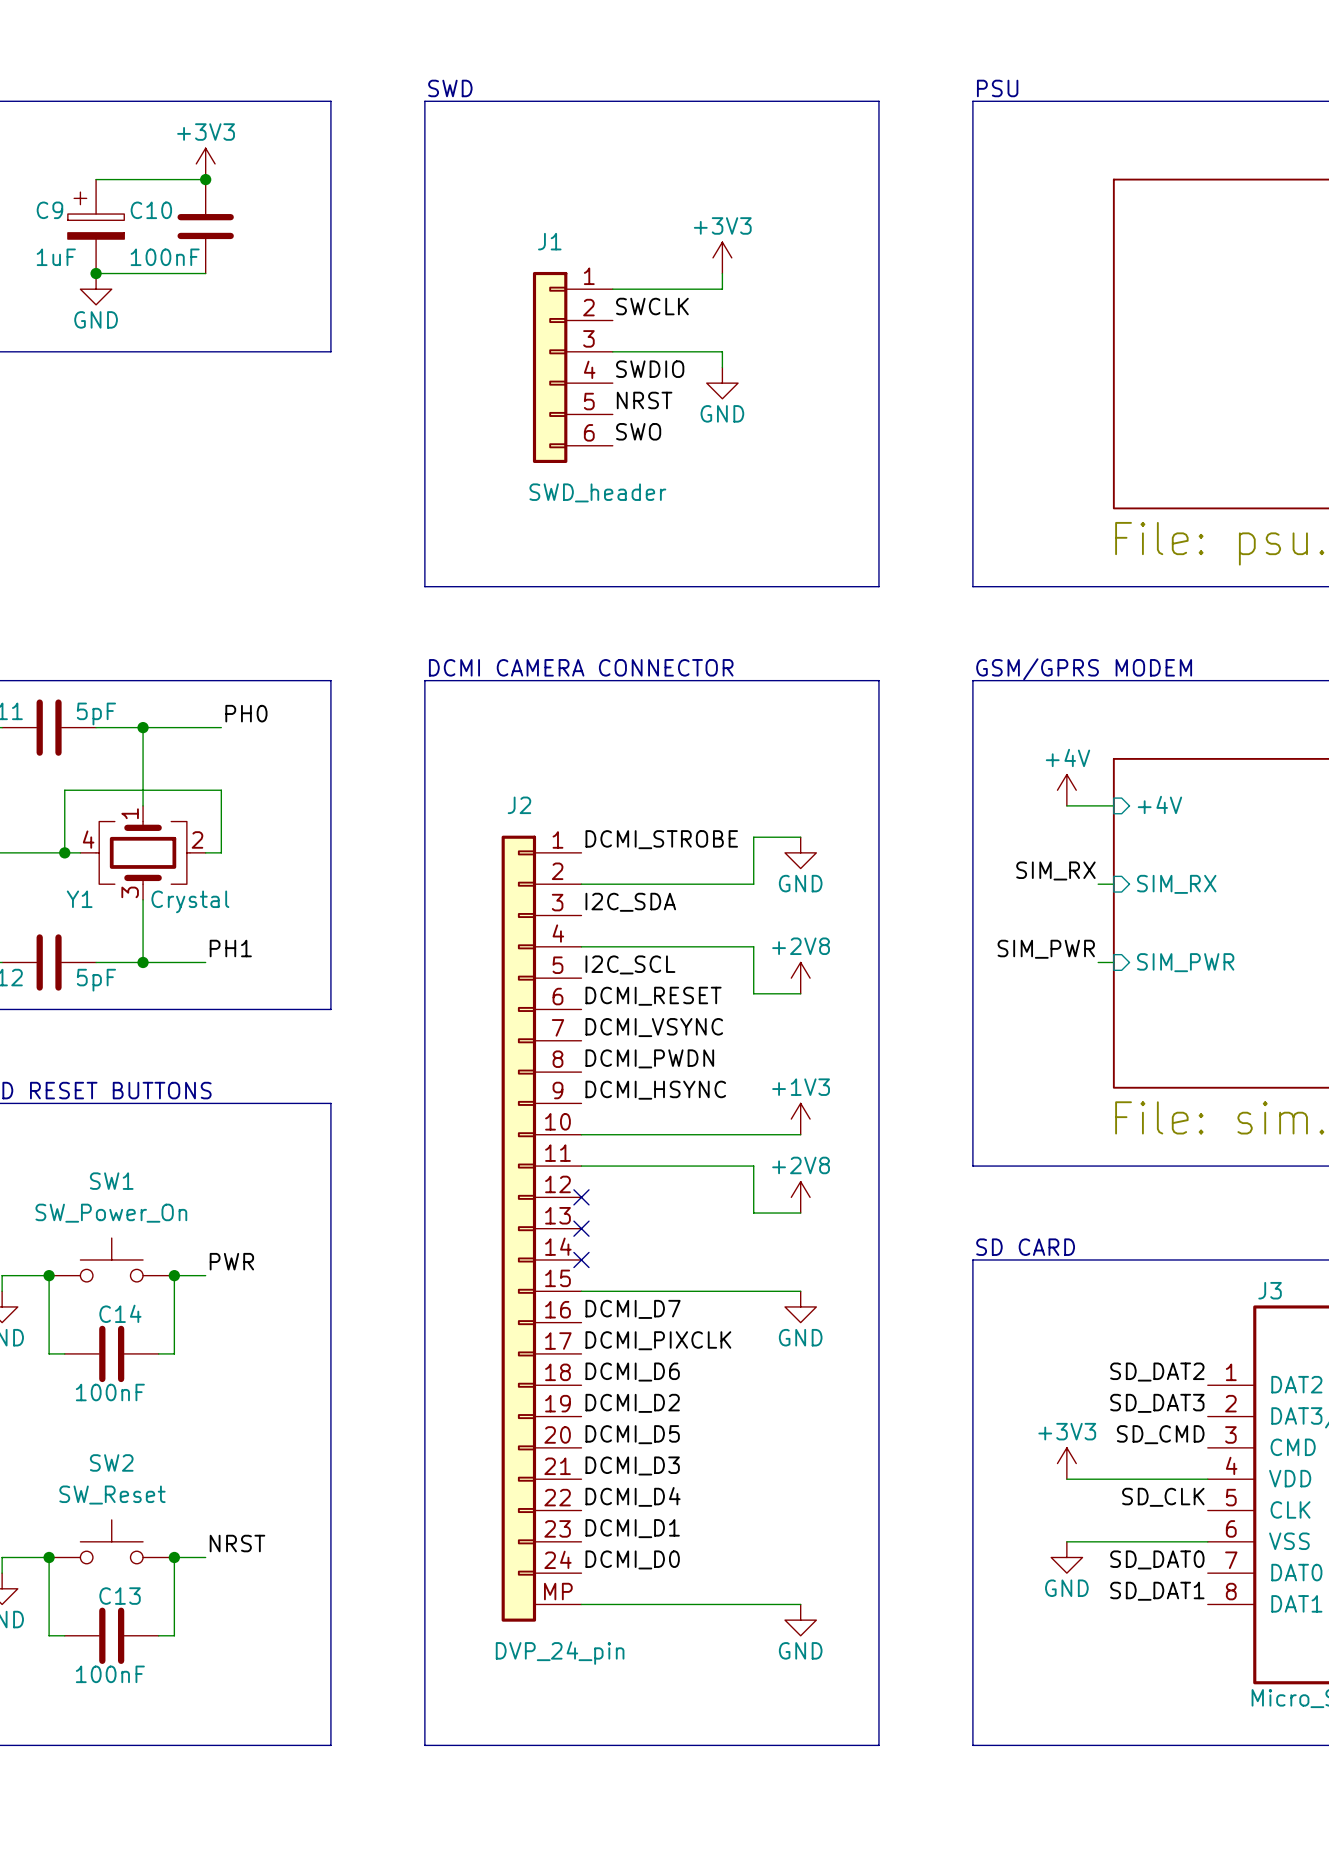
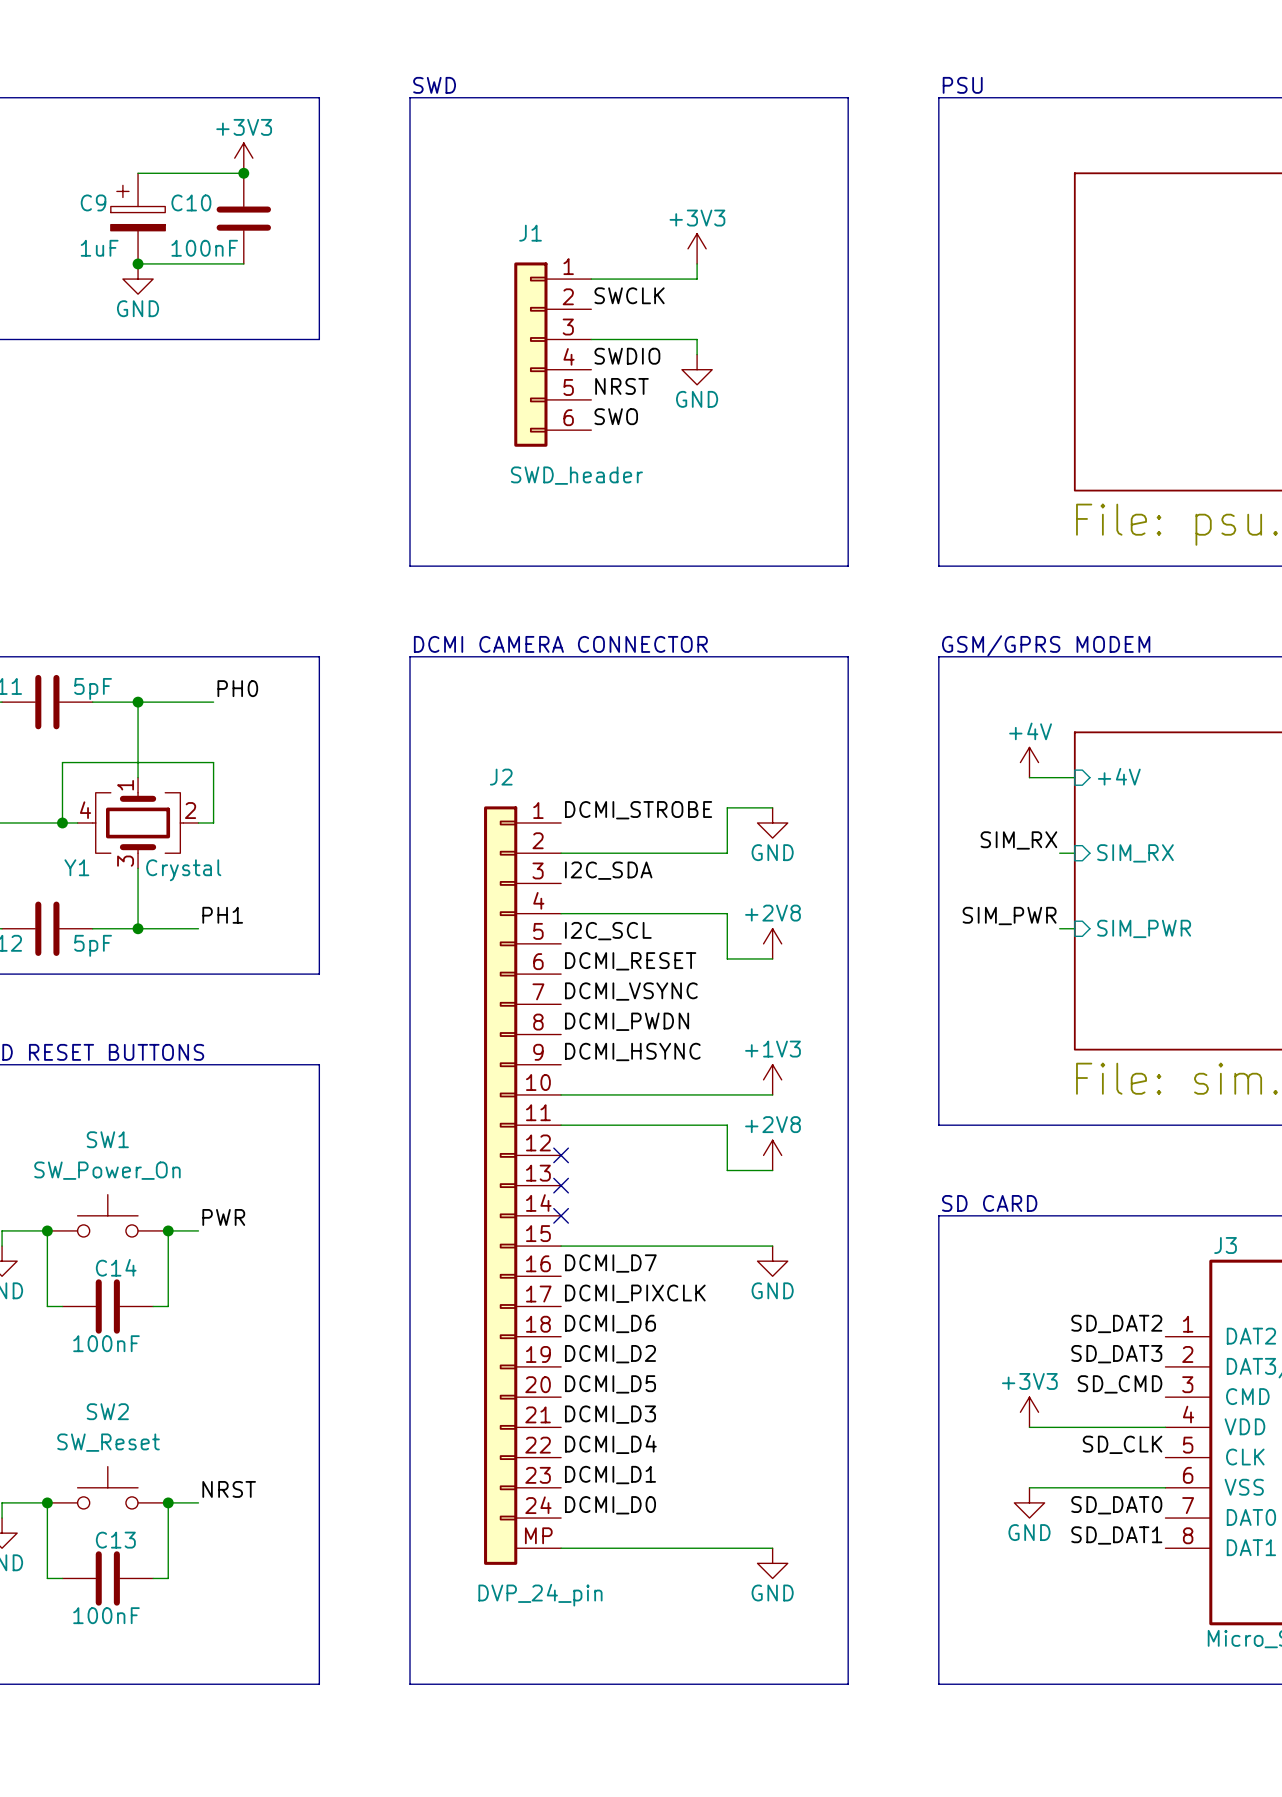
power symbol position: +3V3 (205, 163) -> +3V3 (243, 158)
wire: (96, 179) (143, 179) -> (198, 173) (243, 173)
junction position: (205, 179) -> (243, 173)
C9 position: (96, 226) -> (138, 218)
C10 position: (205, 226) -> (243, 218)
wire: (96, 273) (143, 273) -> (198, 263) (243, 263)
junction position: (96, 273) -> (138, 263)
power symbol position: GND (96, 289) -> GND (138, 279)

